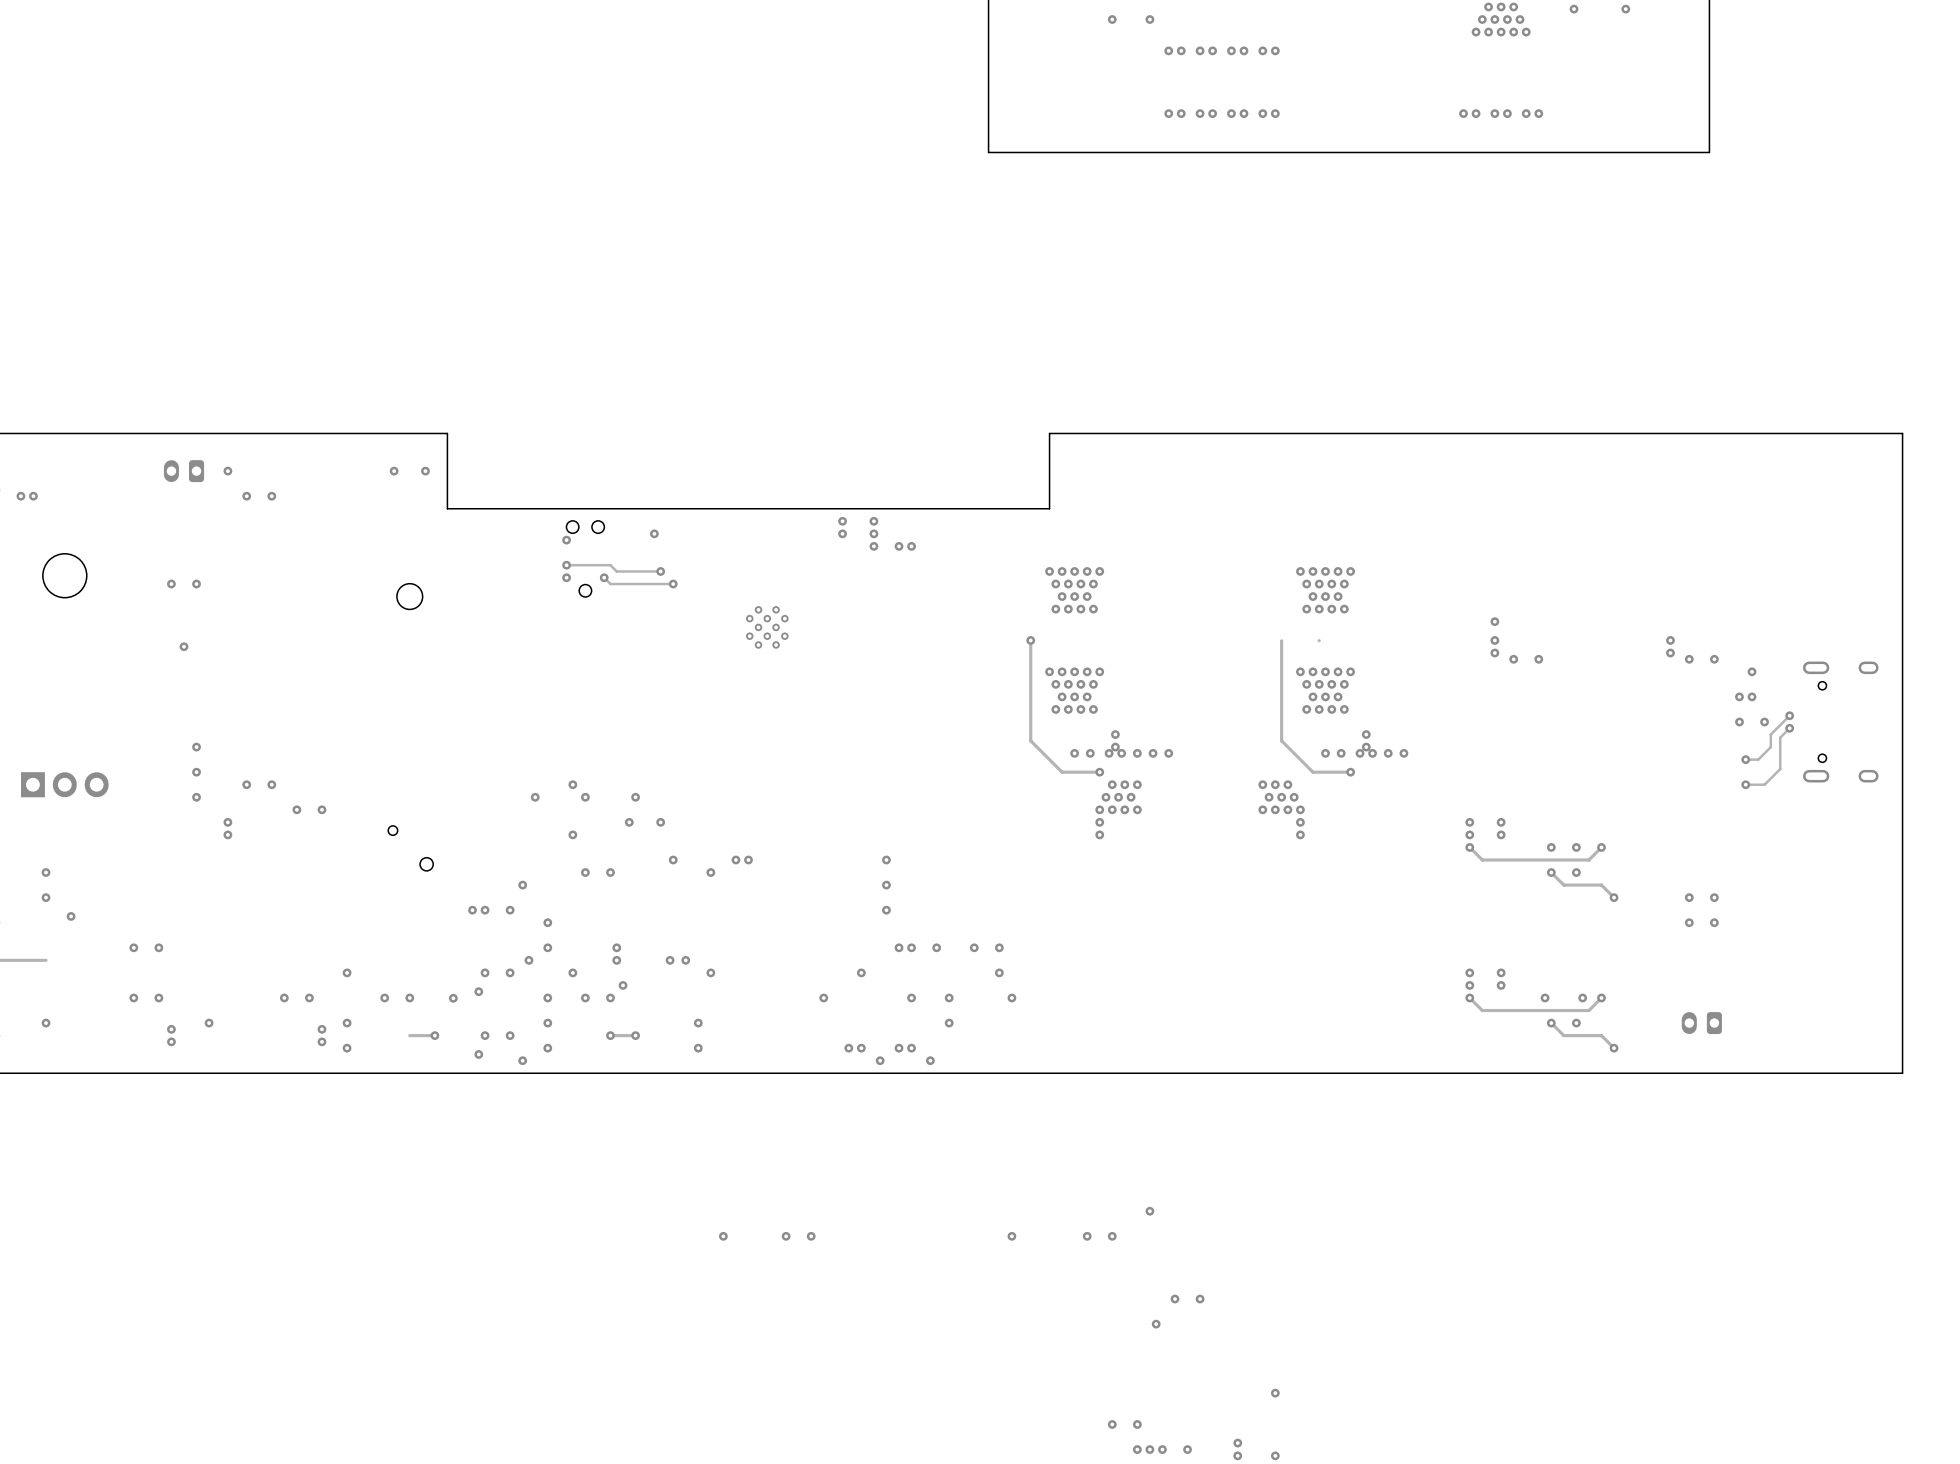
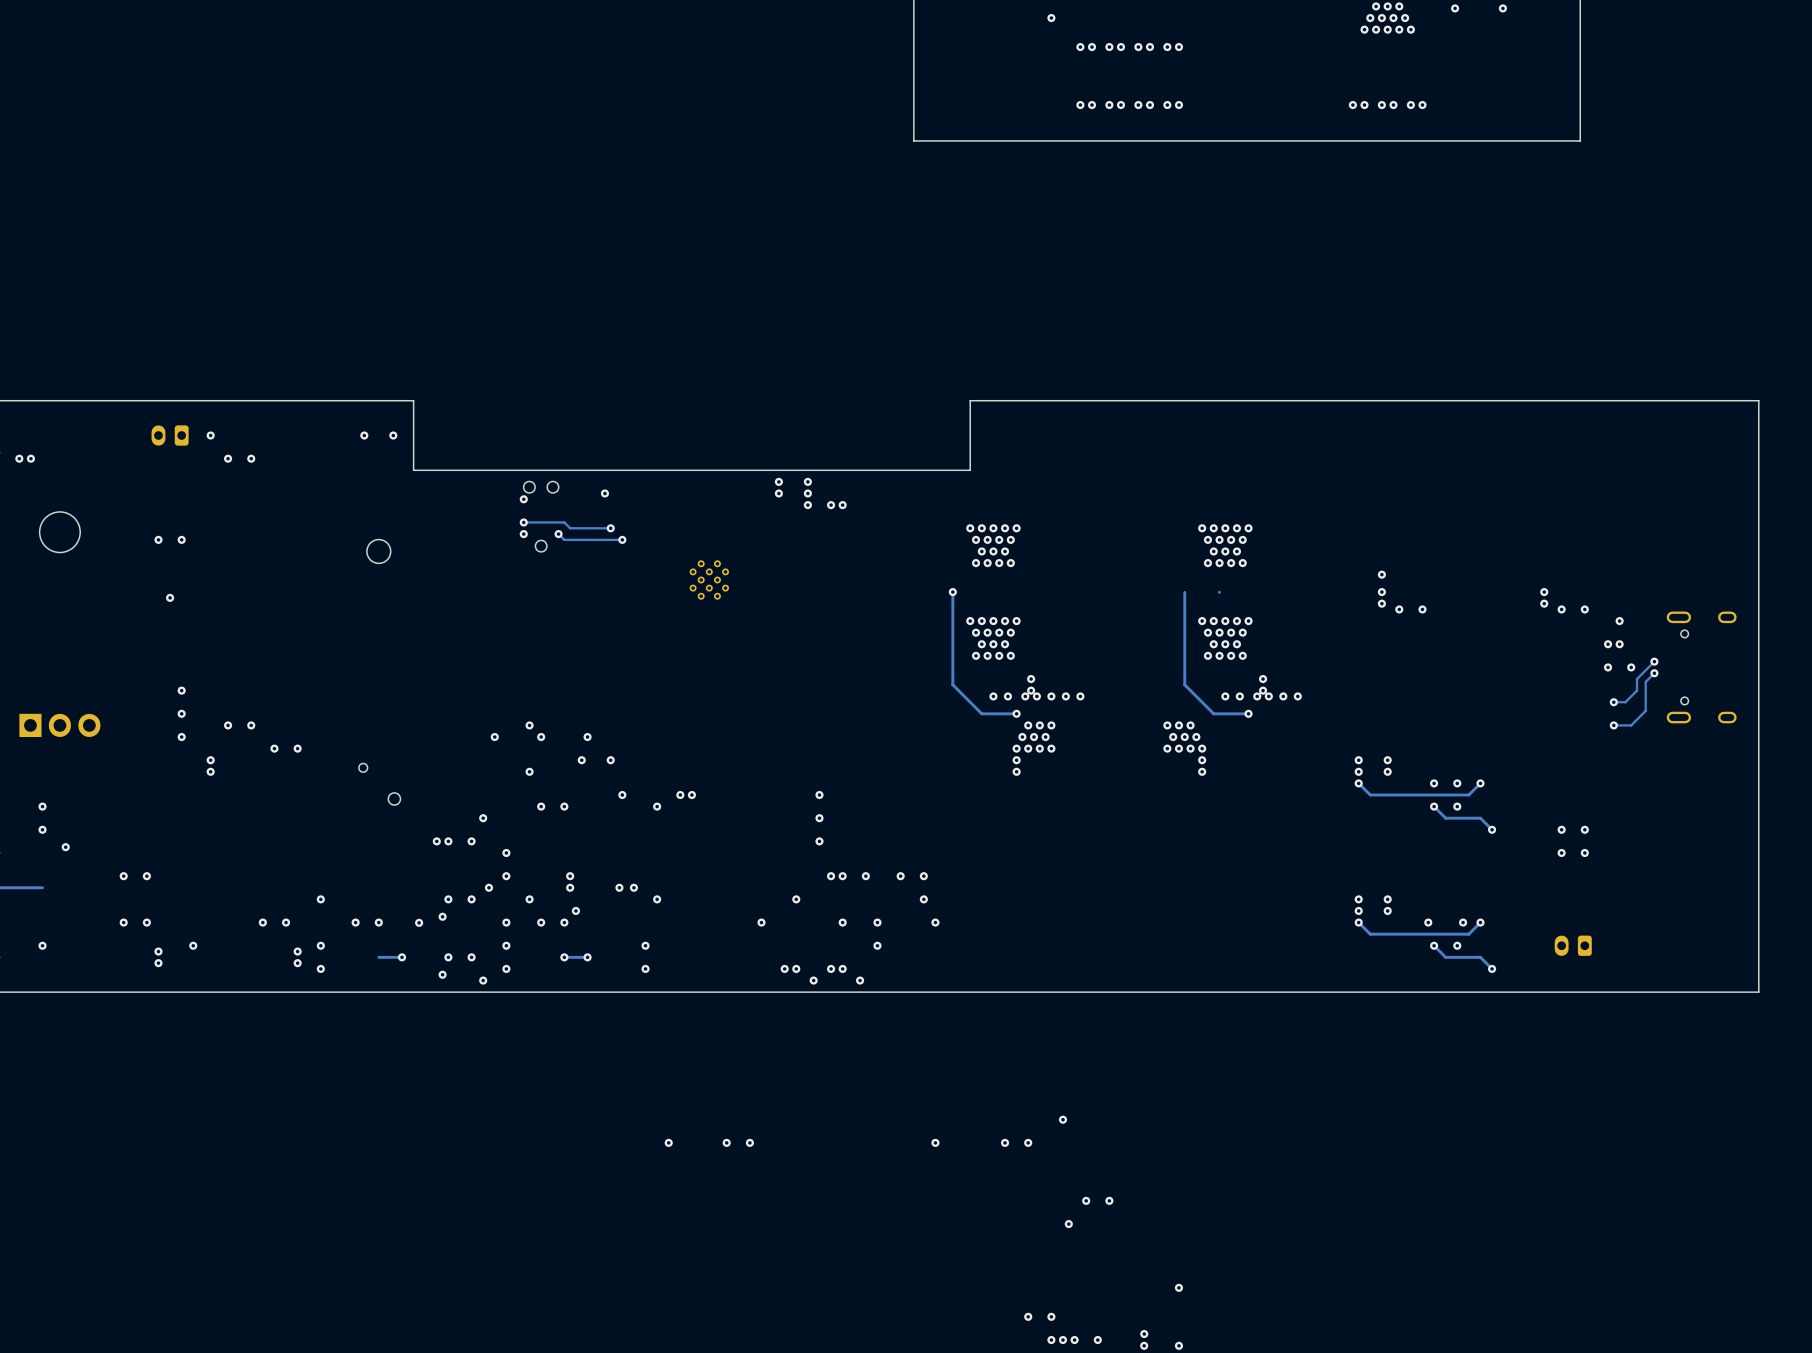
via: (1112, 19) -> none
via: none -> (1051, 18)
via: (1149, 19) -> none

